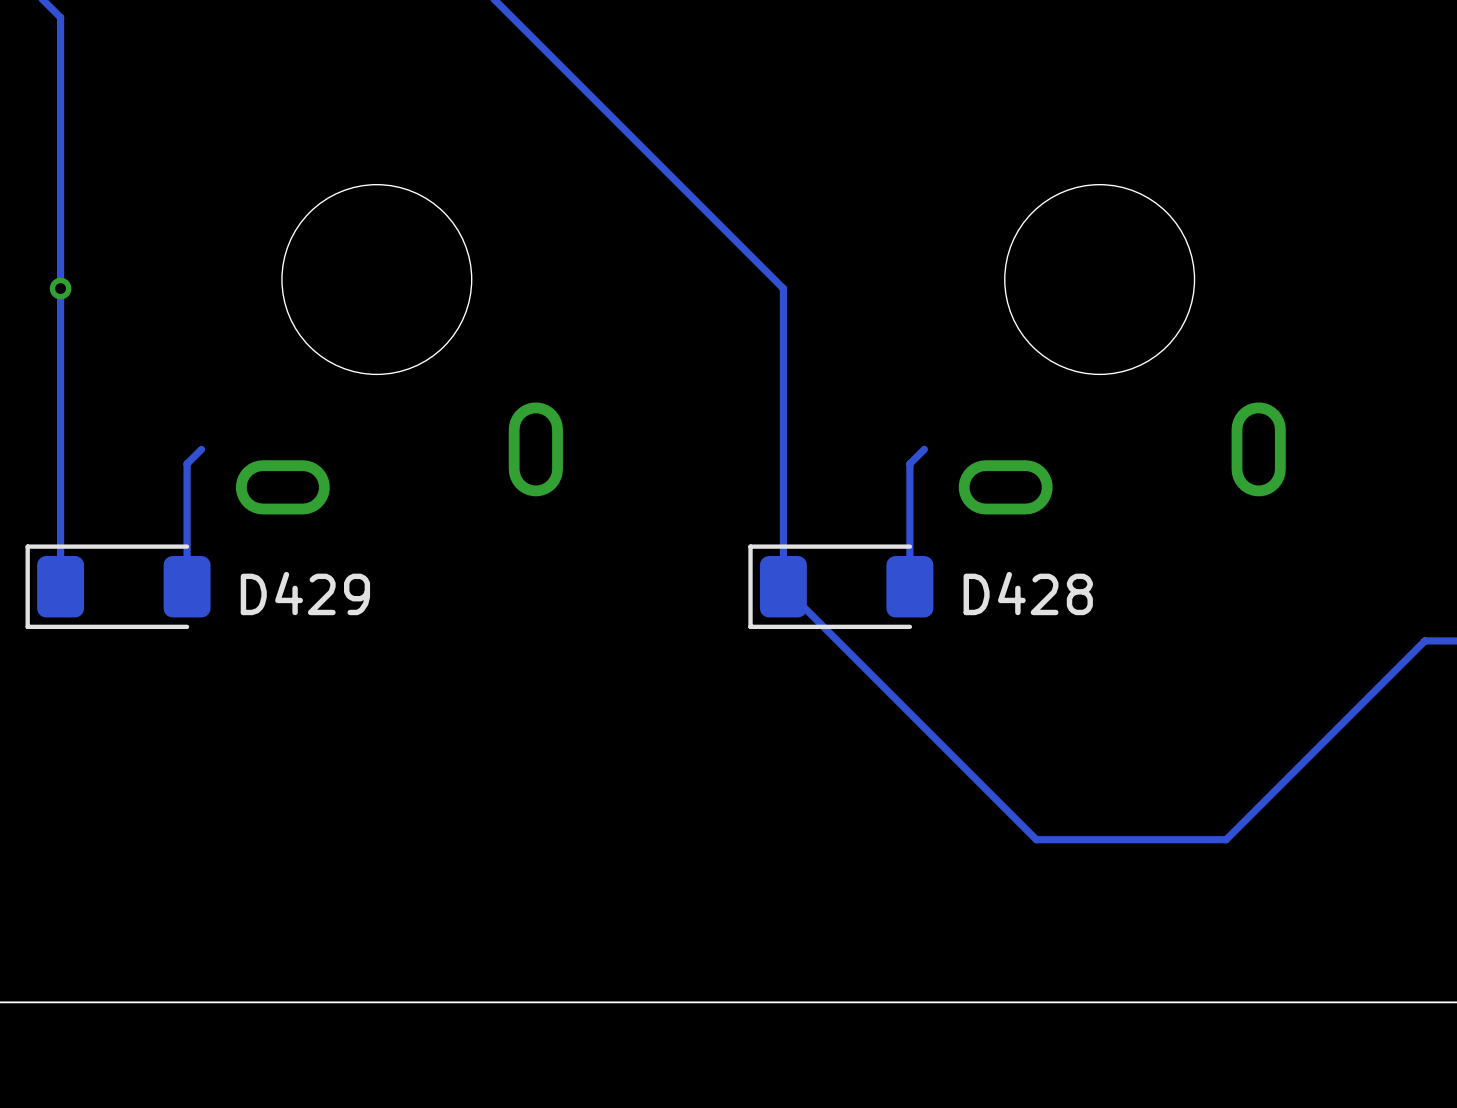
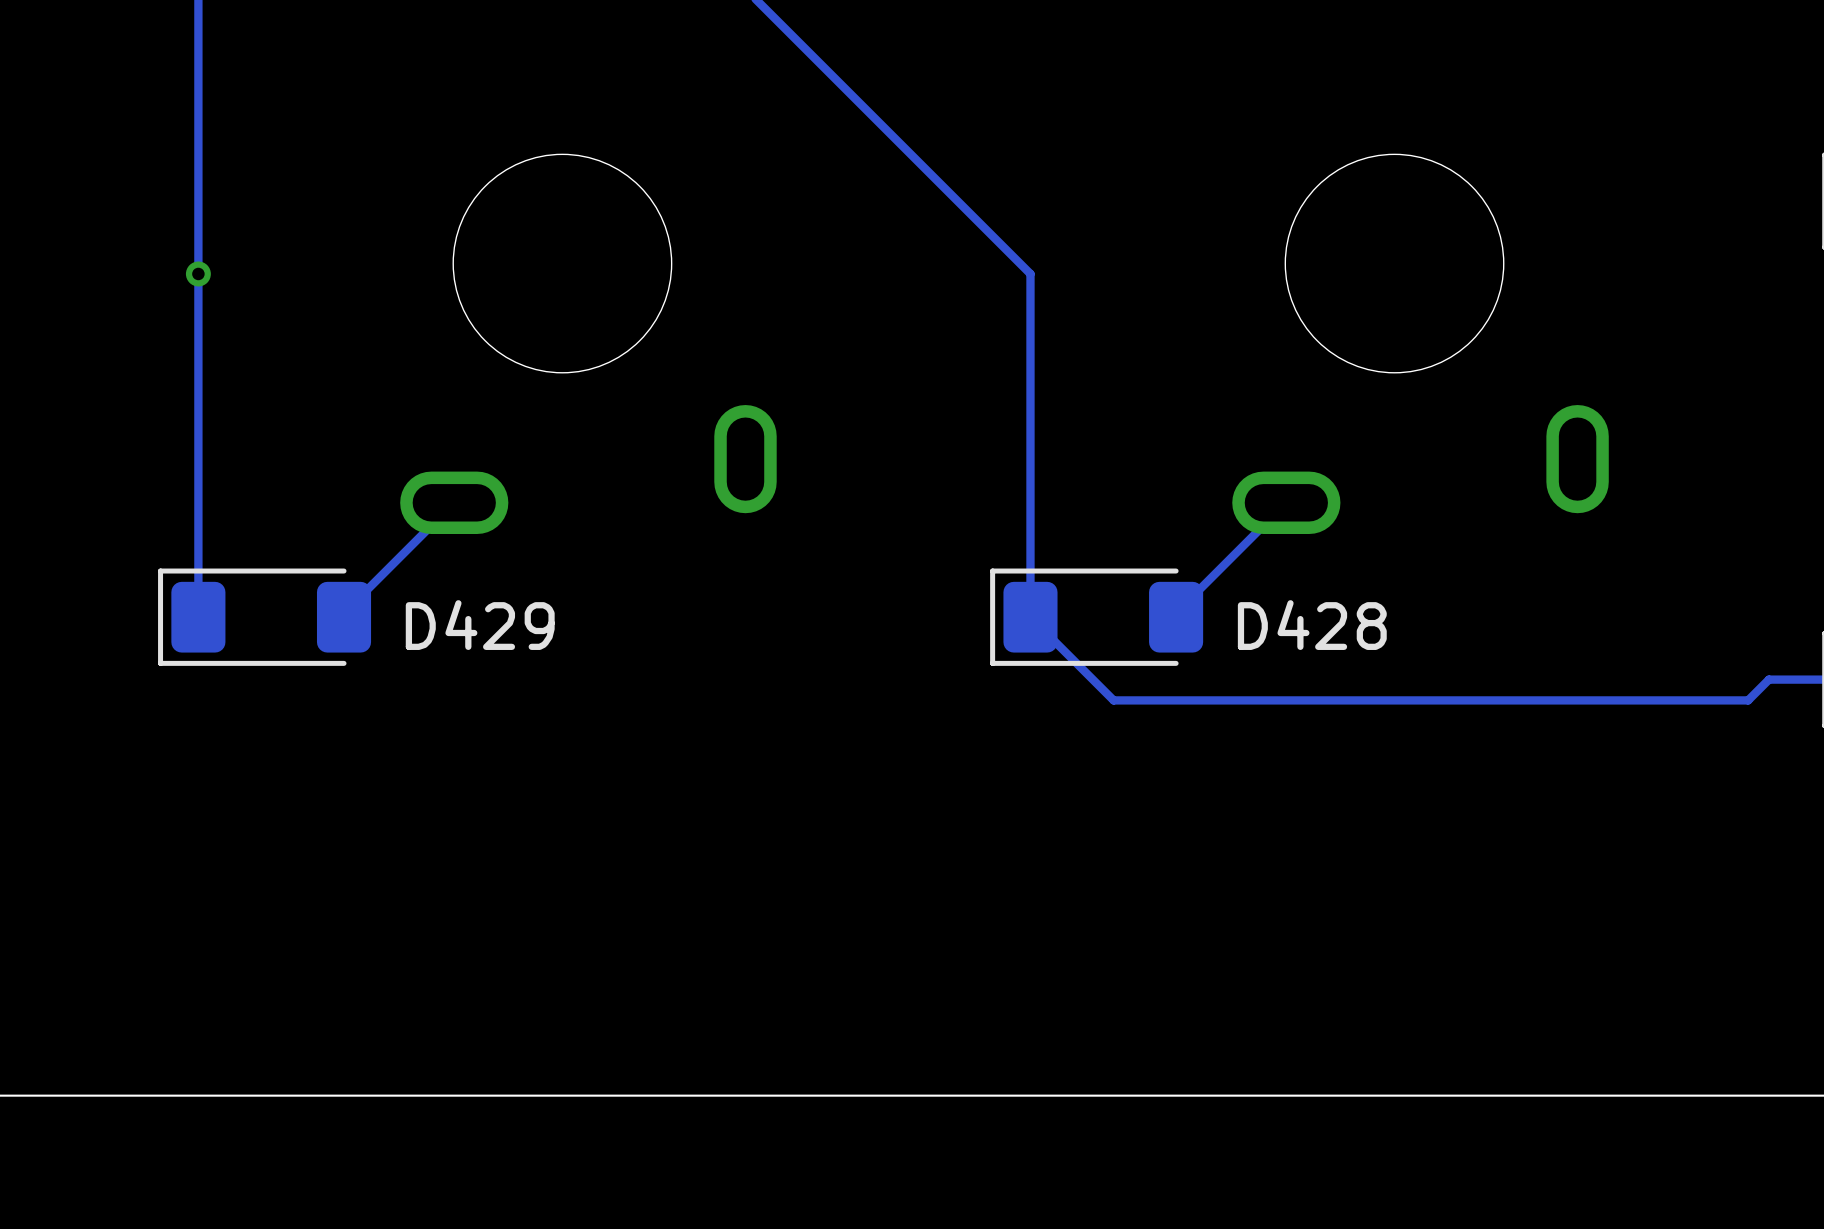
track: (201, 449) (187, 463) (187, 583) -> (454, 502) (344, 613)
track: (924, 449) (909, 463) (909, 583) -> (1286, 502) (1176, 613)
track: (1406, 659) (1226, 839) (1036, 839) (855, 659) -> (1748, 700) (1113, 700)

